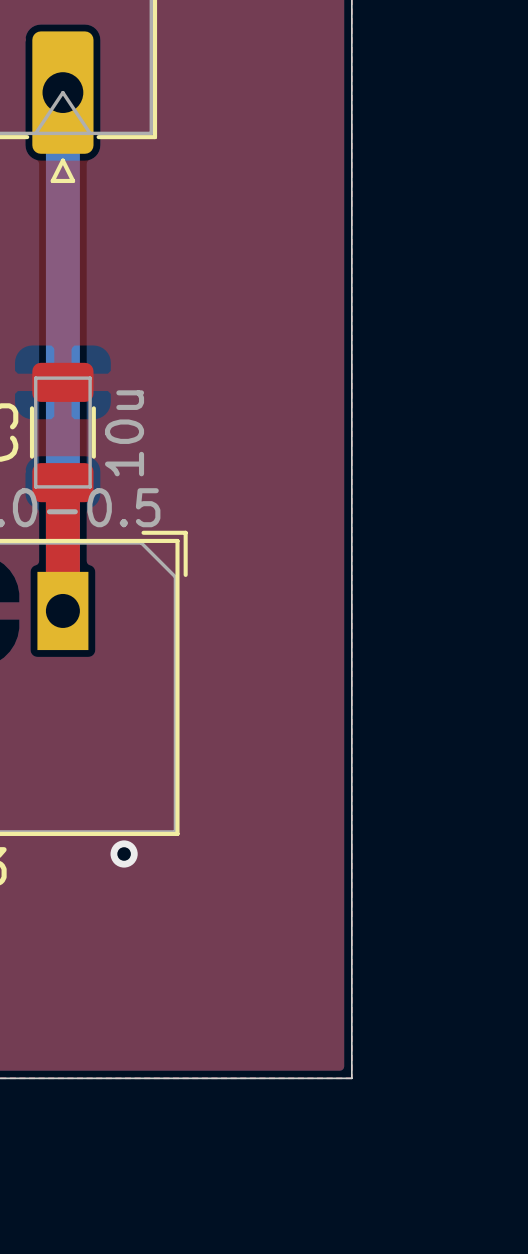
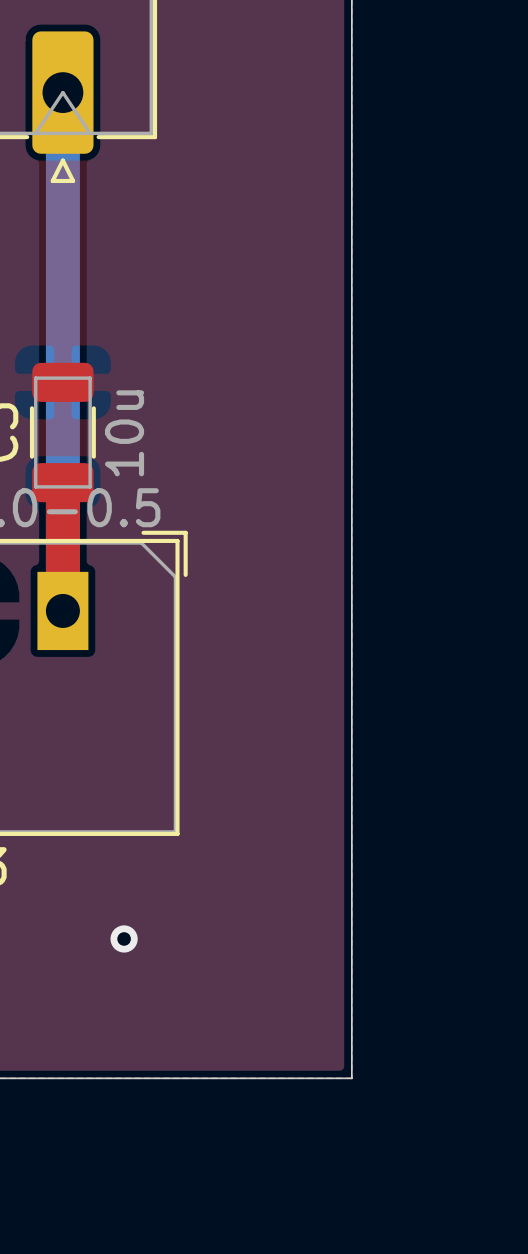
via position: (124, 853) -> (124, 938)

